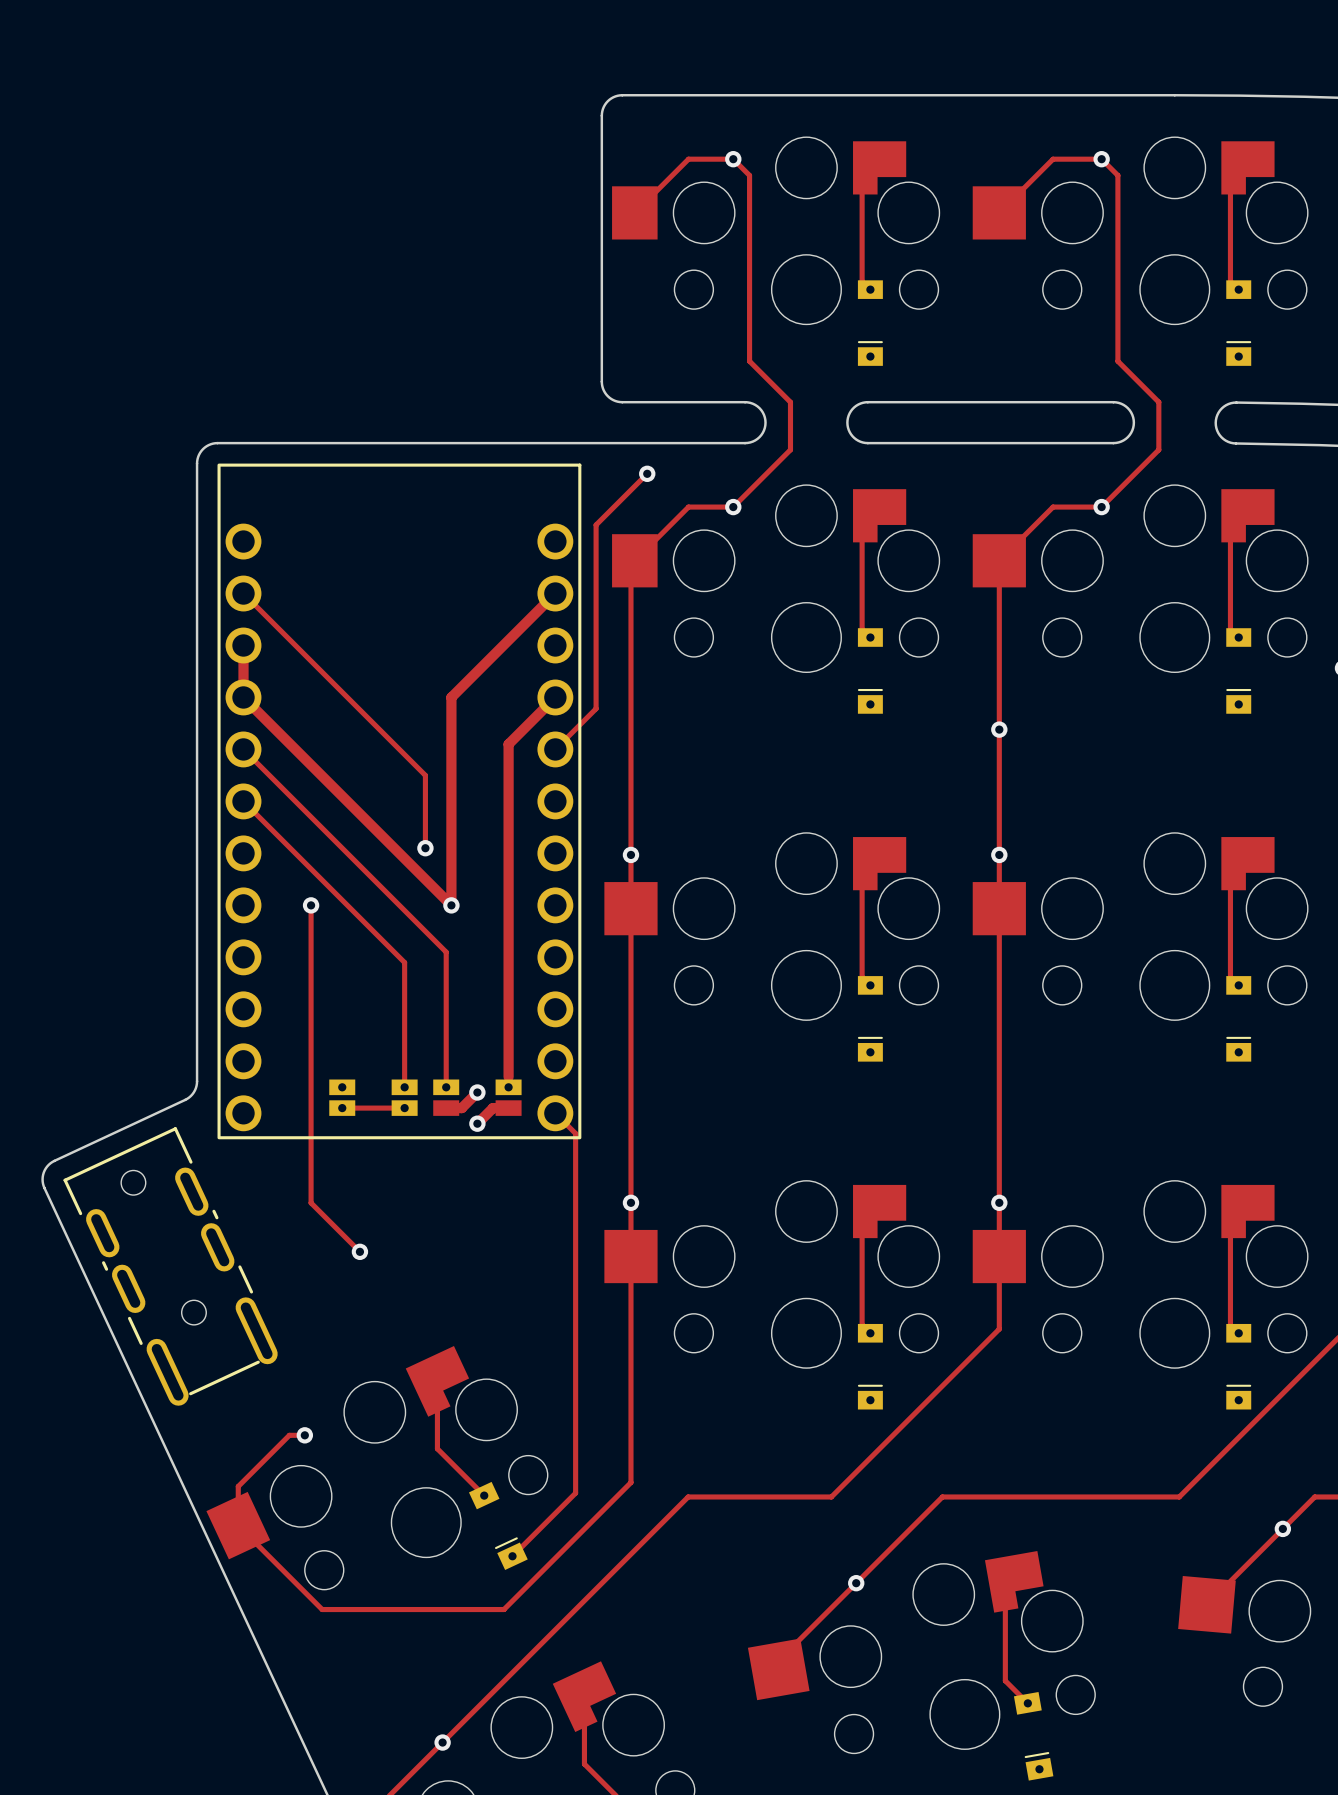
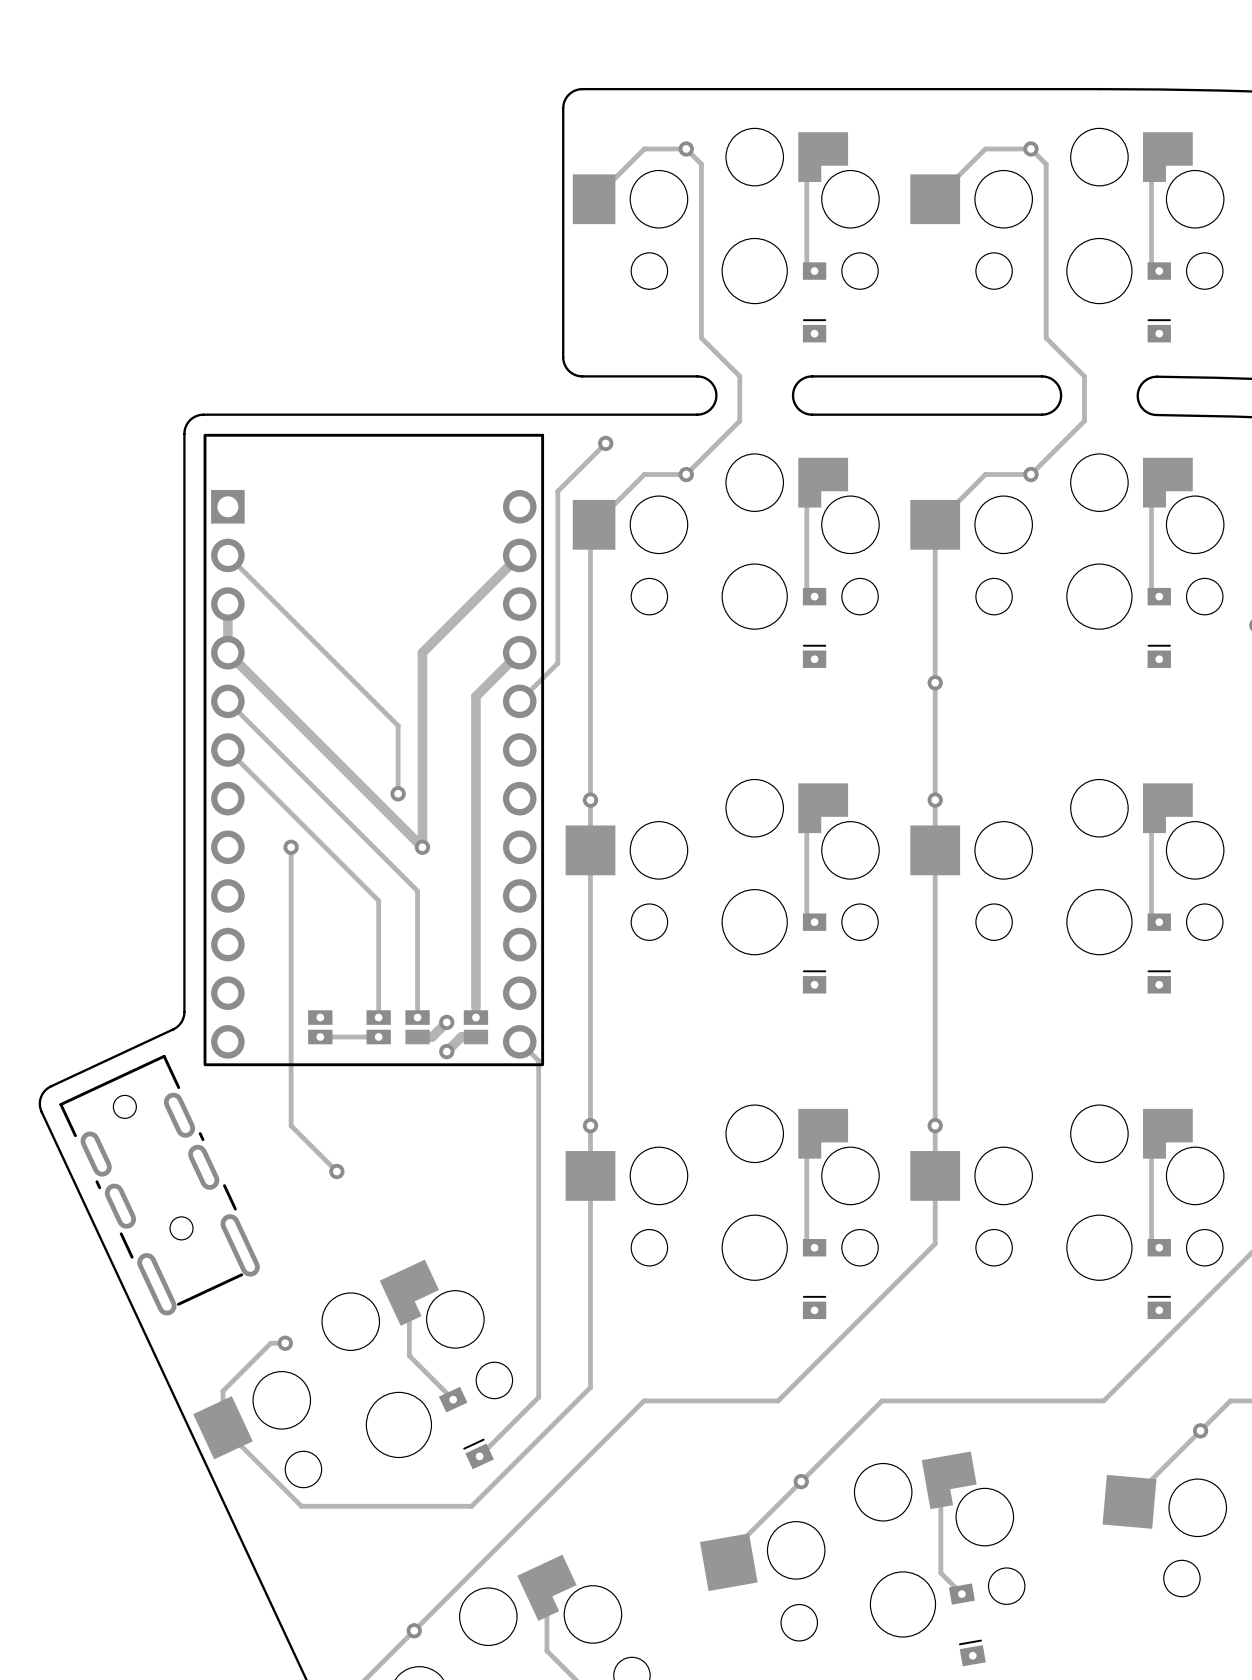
part footprint: [217, 463, 582, 1140] -> [203, 433, 545, 1067]

